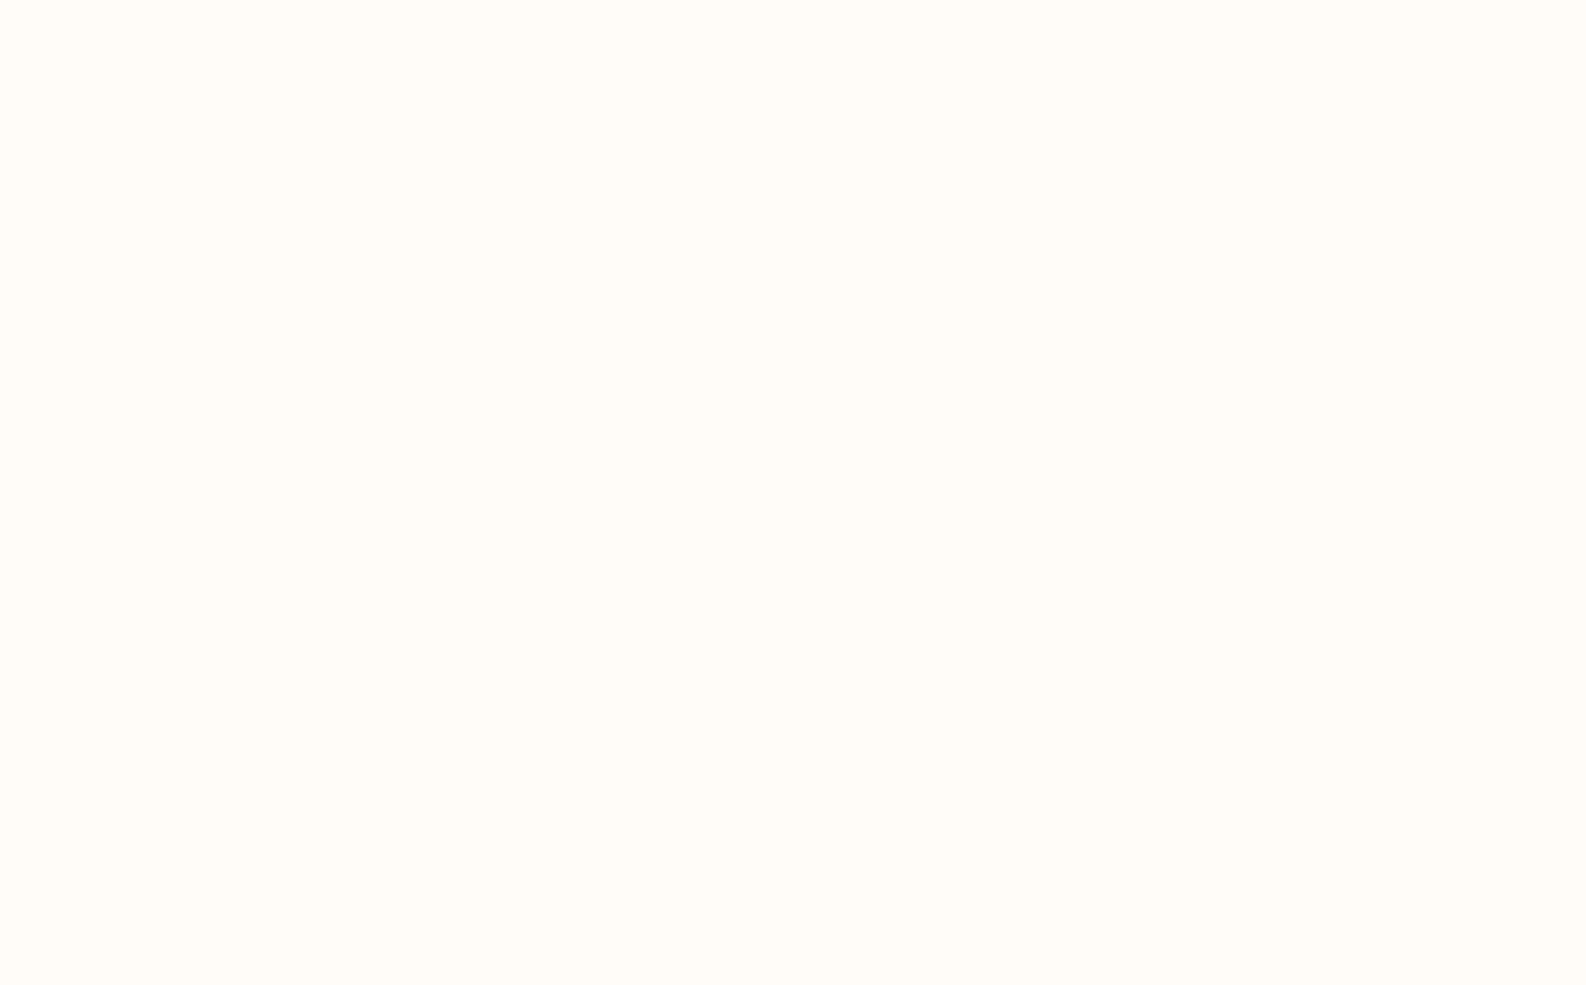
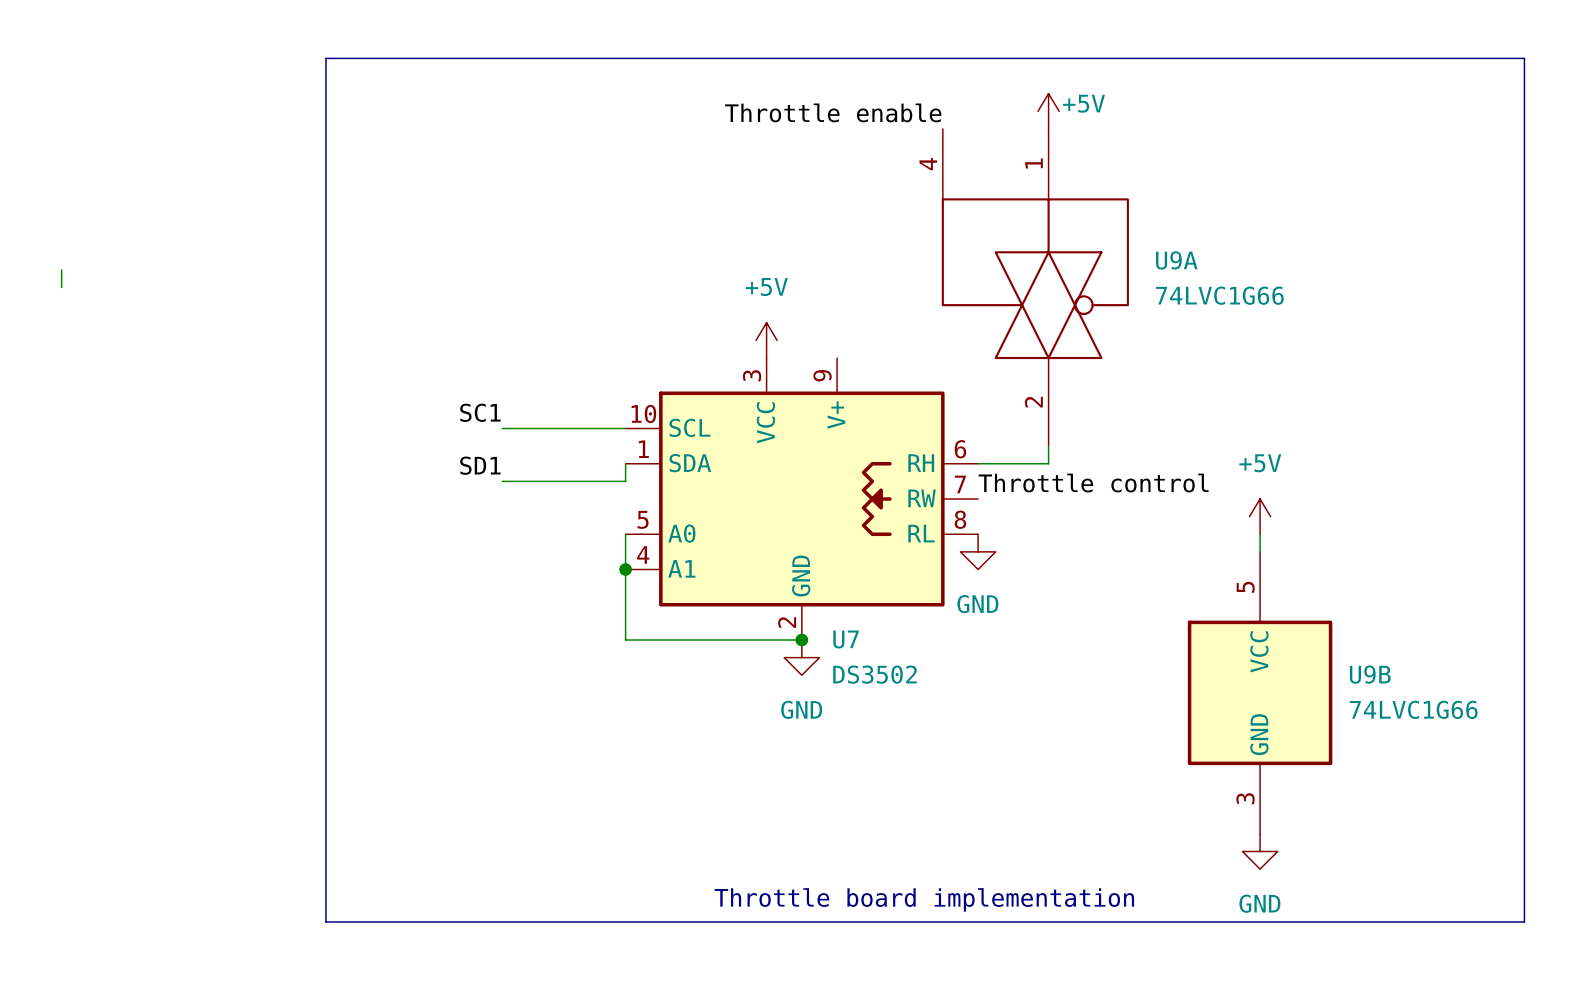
line: none -> (325, 58) (1524, 58) (1524, 921) (325, 921) (325, 58)
power symbol: none -> +5V (1048, 111)
label: none -> Throttle enable (833, 112)
wire: none -> (61, 269) (61, 287)
U9A: none -> 74LVC1G66 (1035, 287)
power symbol: none -> +5V (766, 340)
label: none -> SC1 (480, 412)
wire: none -> (502, 428) (625, 428)
wire: none -> (1048, 446) (1048, 463) (978, 463)
wire: none -> (625, 463) (625, 481) (502, 481)
label: none -> SD1 (480, 465)
label: none -> Throttle control (1093, 483)
U7: none -> DS3502 (801, 499)
power symbol: none -> +5V (1260, 516)
wire: none -> (625, 534) (625, 640) (801, 640)
wire: none -> (1260, 534) (1260, 551)
power symbol: none -> GND (978, 551)
junction: none -> (625, 569)
junction: none -> (801, 640)
power symbol: none -> GND (801, 657)
U9B: none -> 74LVC1G66 (1260, 692)
power symbol: none -> GND (1260, 851)
text: none -> Throttle board implementation (924, 899)

